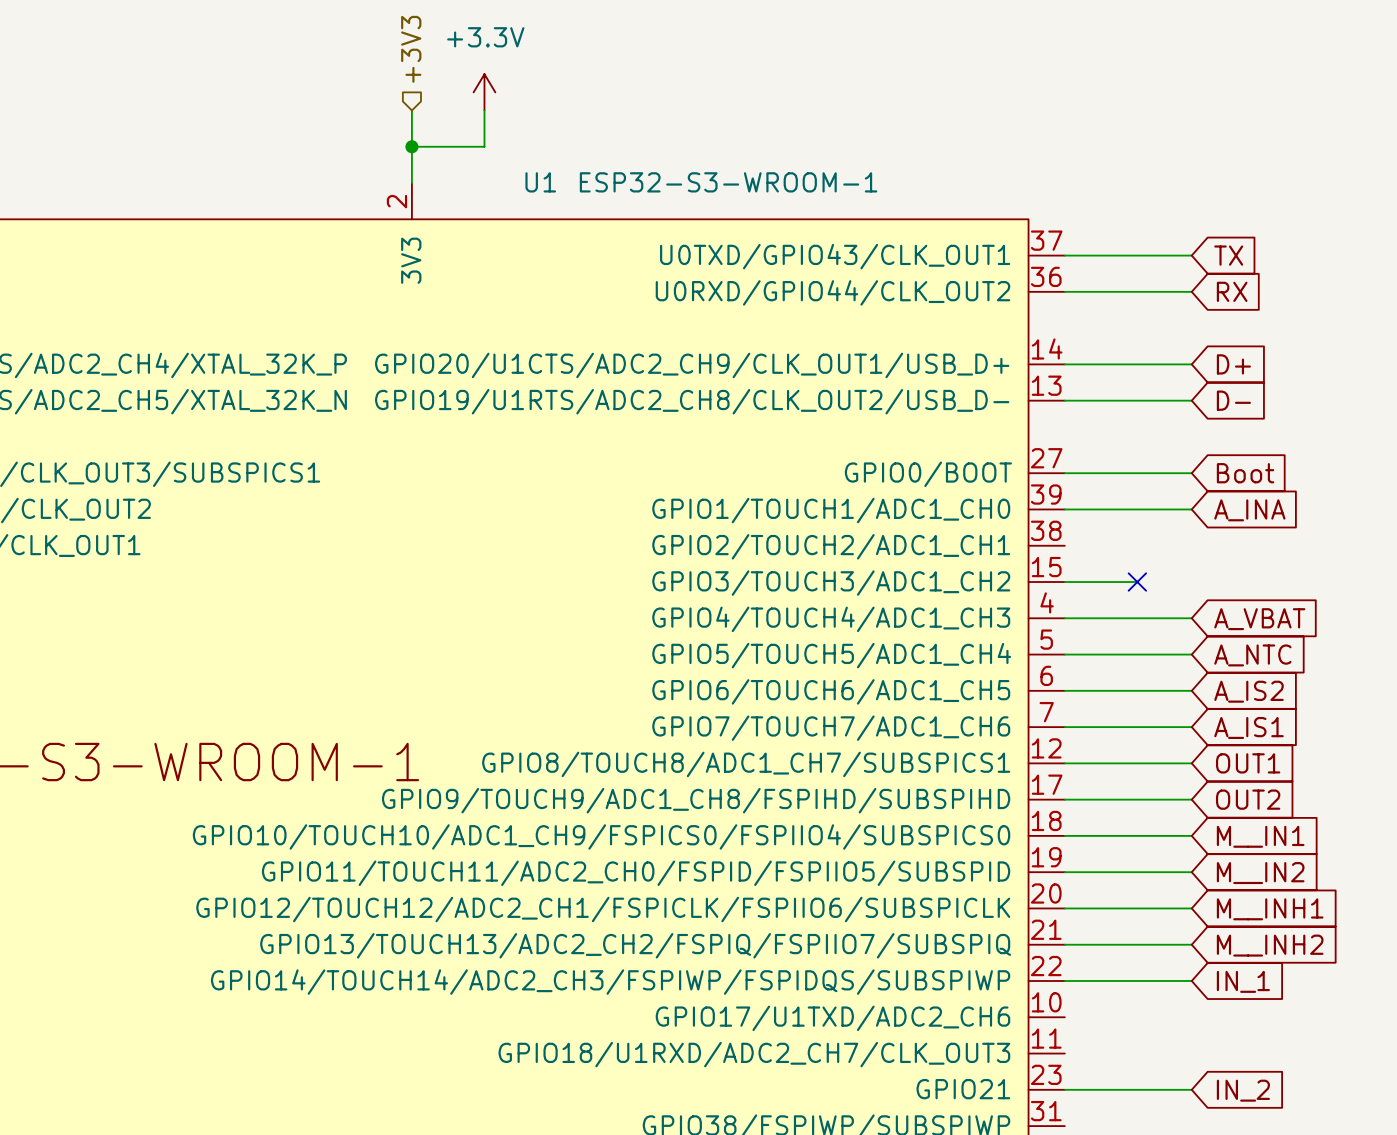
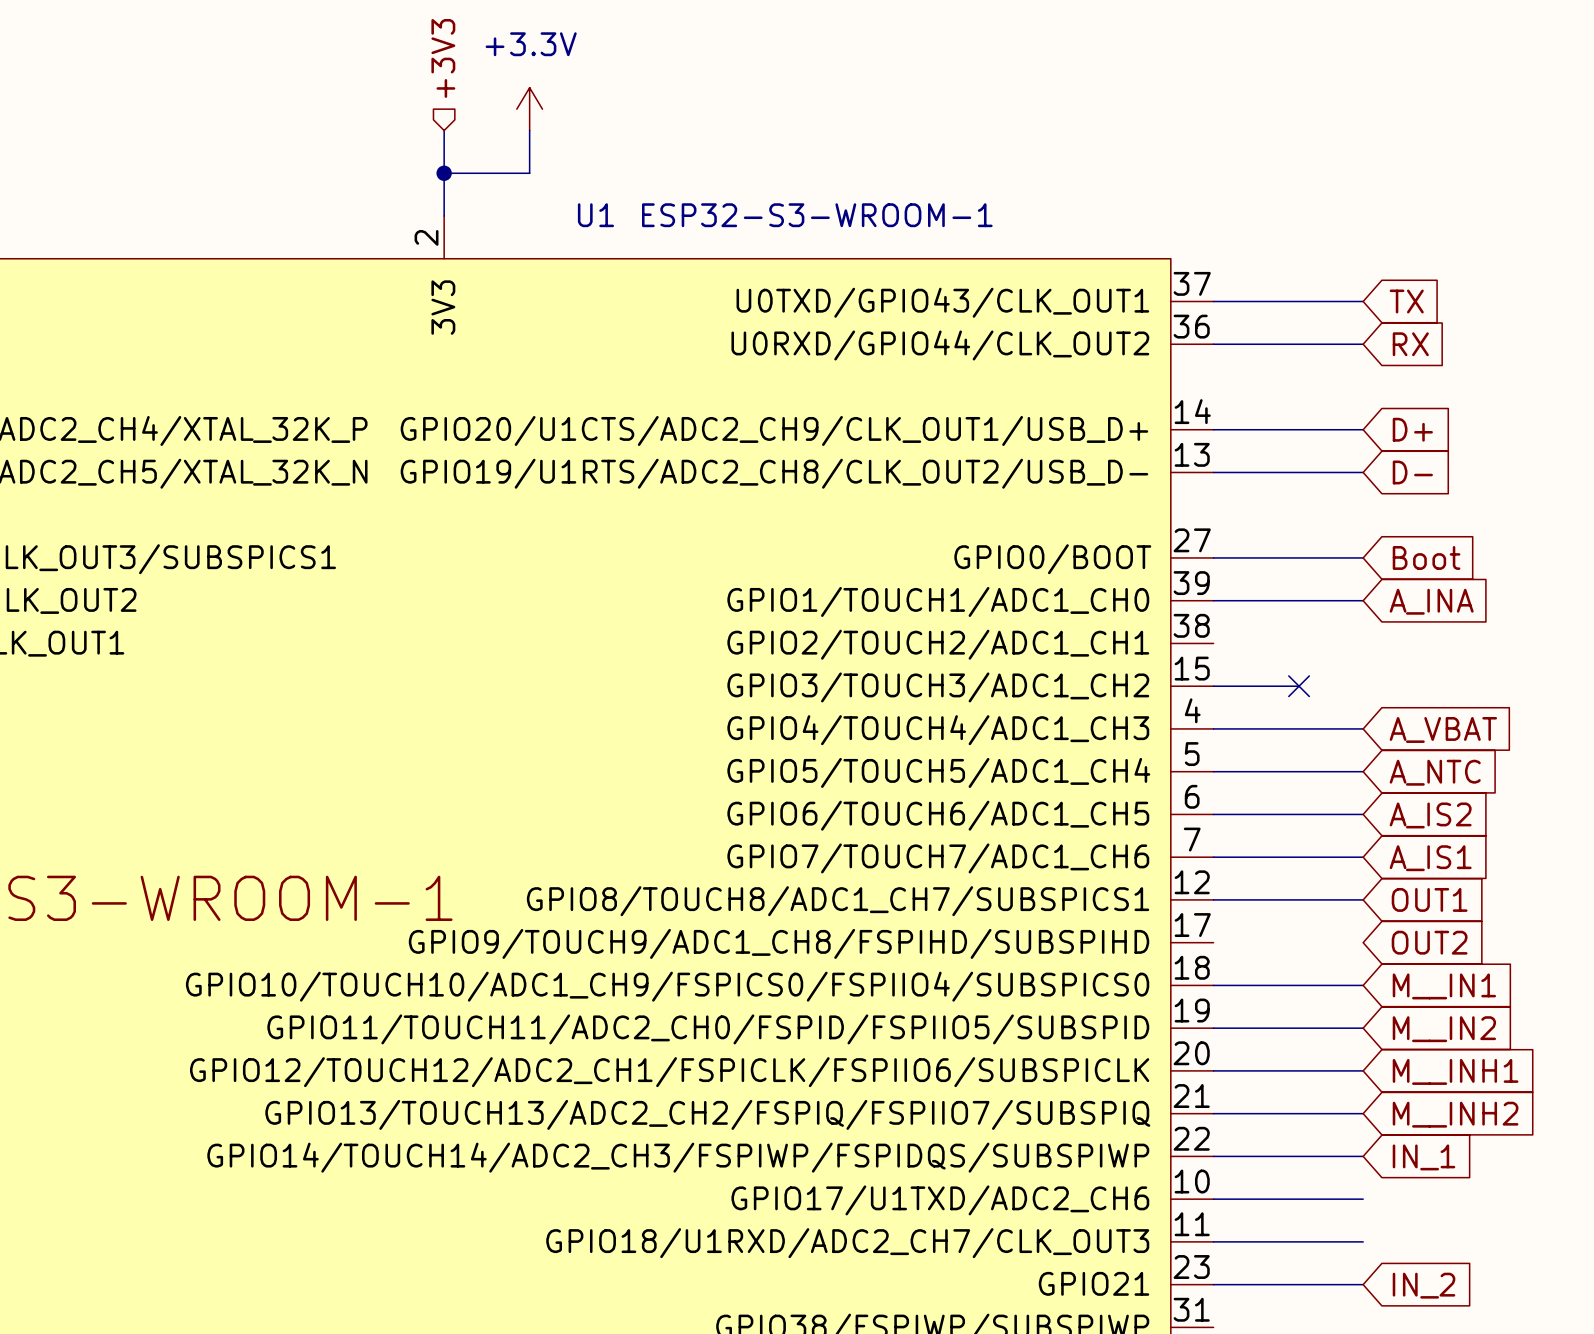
wire: (1064, 799) (1191, 799) -> (1213, 1199) (1363, 1199)
wire: none -> (1213, 1241) (1363, 1241)

